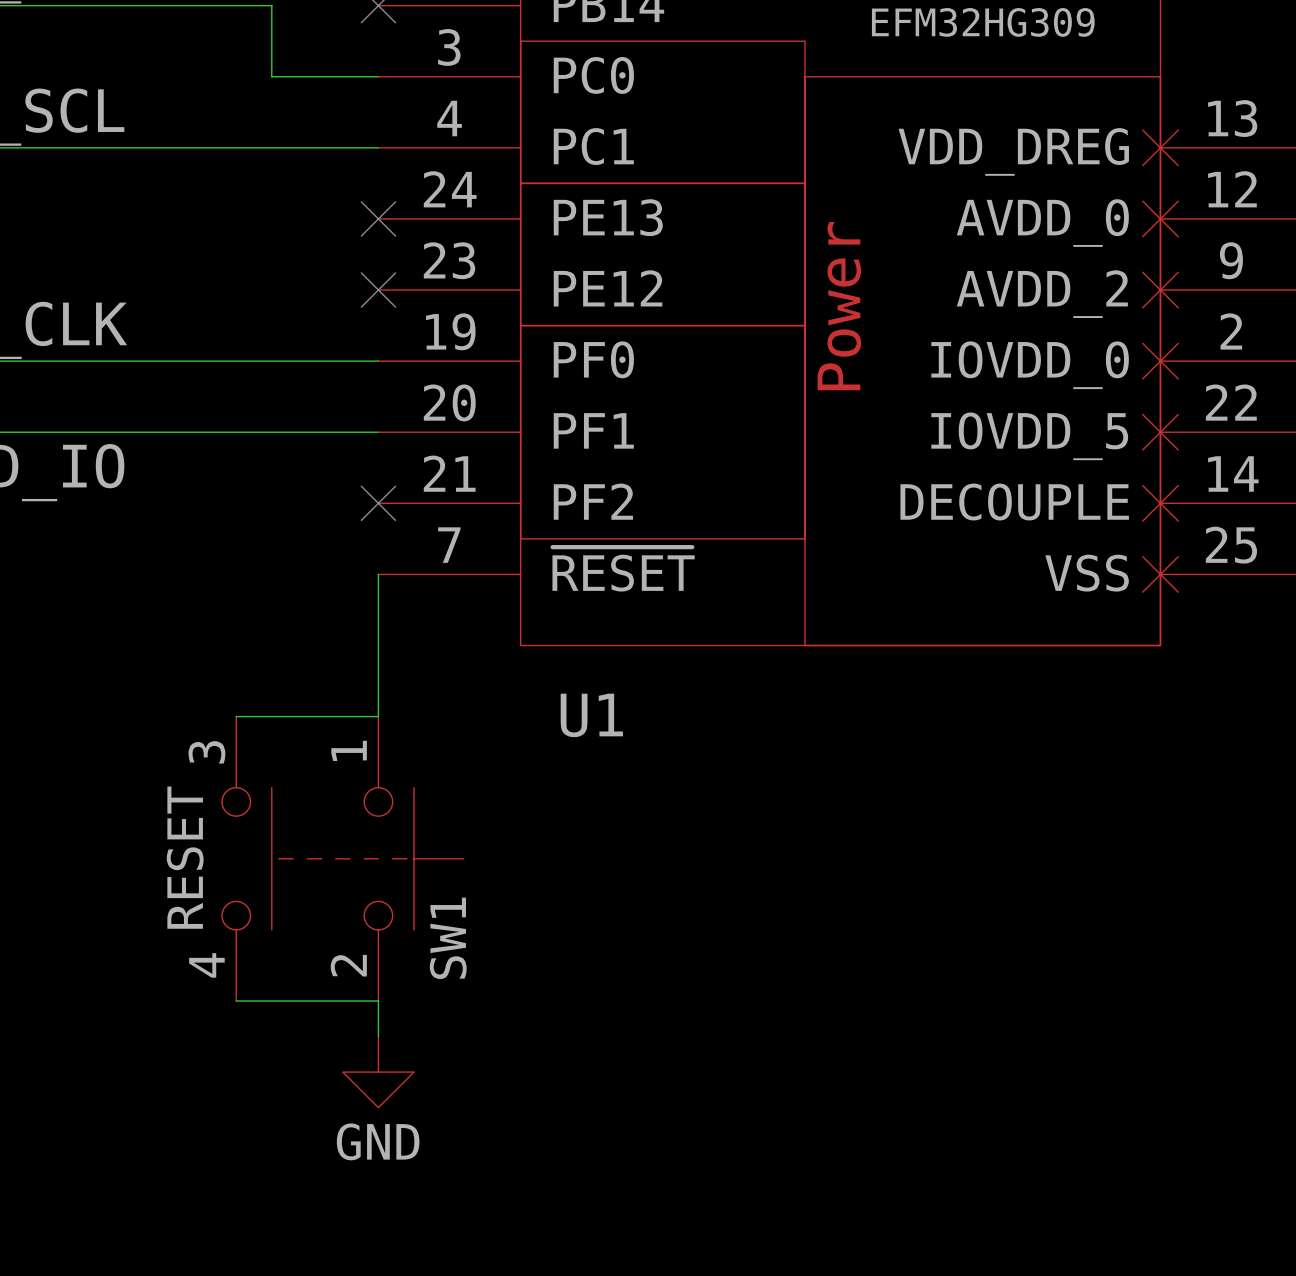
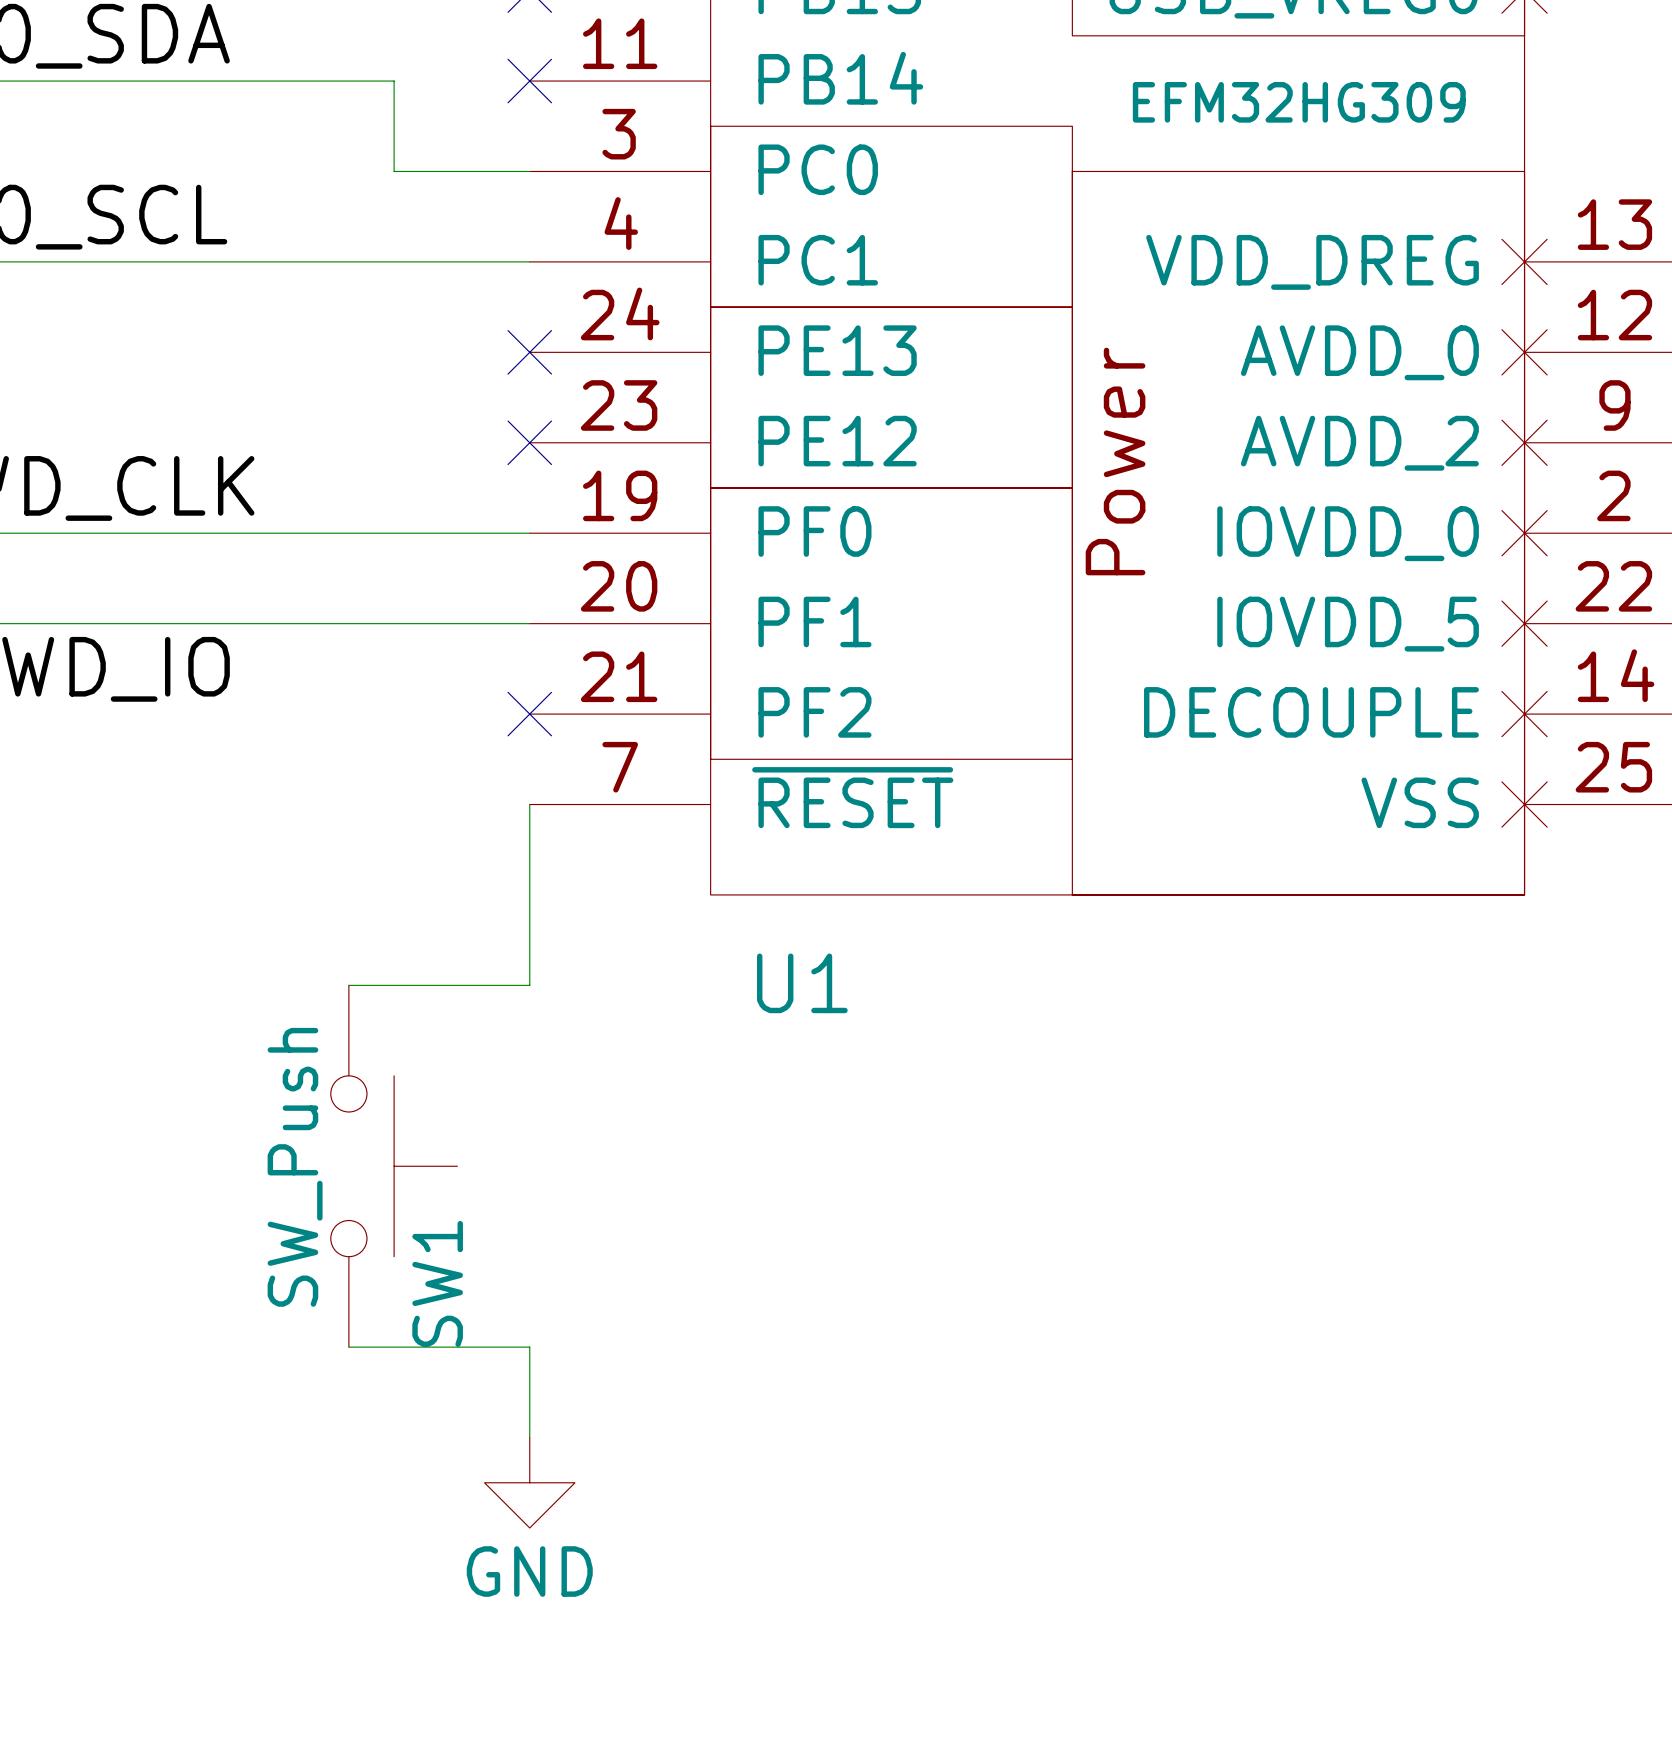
SW1 symbol: [222, 716, 464, 1001] -> [330, 985, 458, 1348]
SW1 value: RESET (185, 857) -> SW_Push (295, 1167)
SW1 name position: SW1 (448, 938) -> SW1 (437, 1283)
power symbol position: GND (378, 1072) -> GND (529, 1482)

